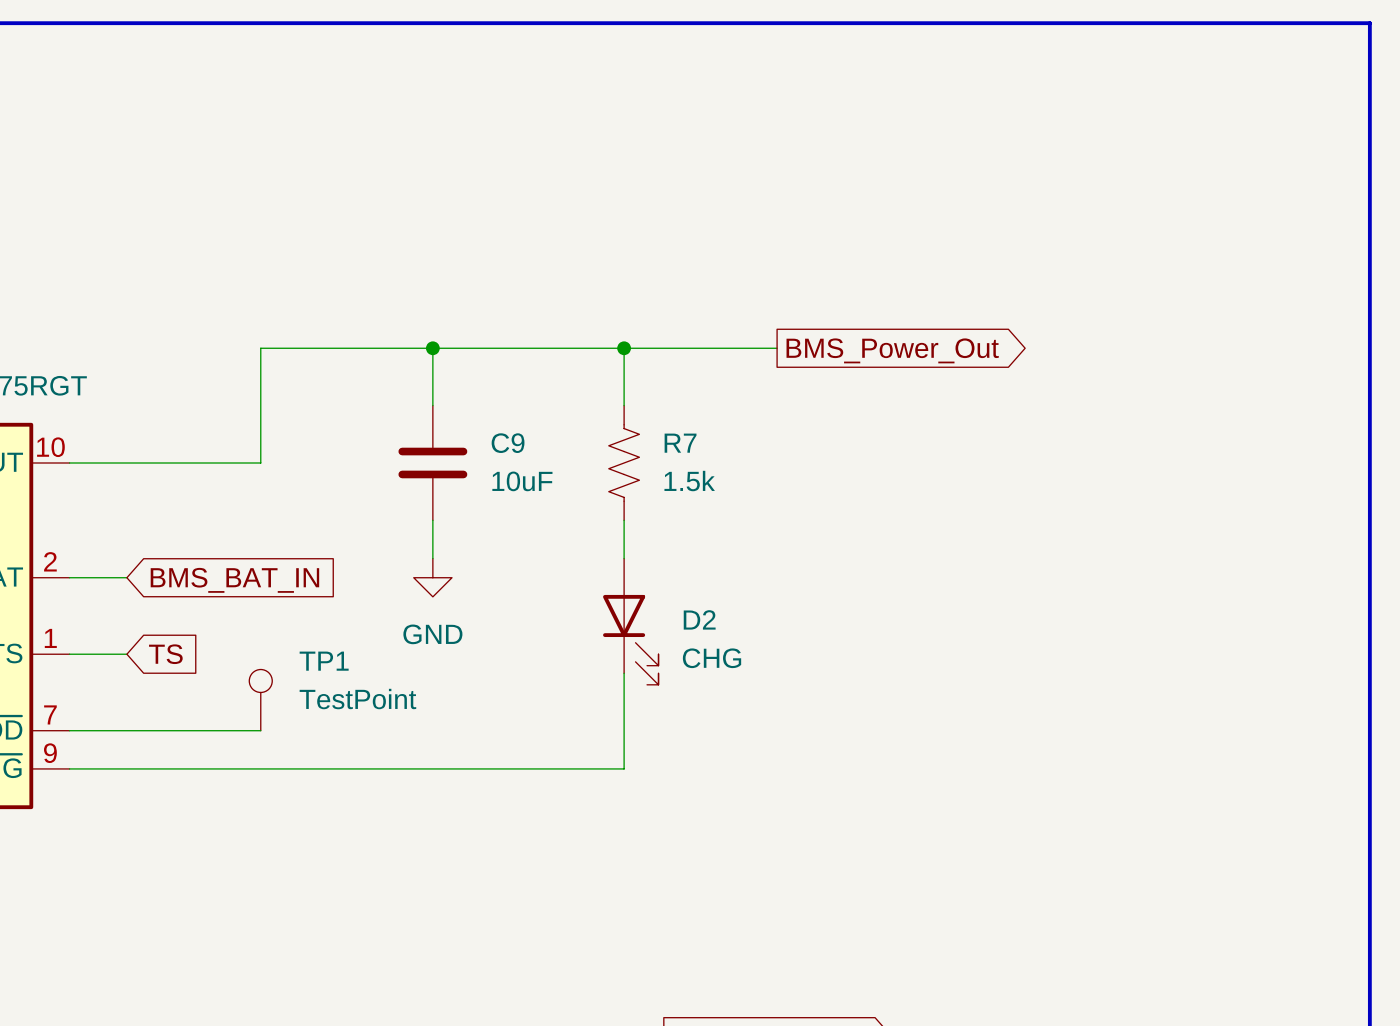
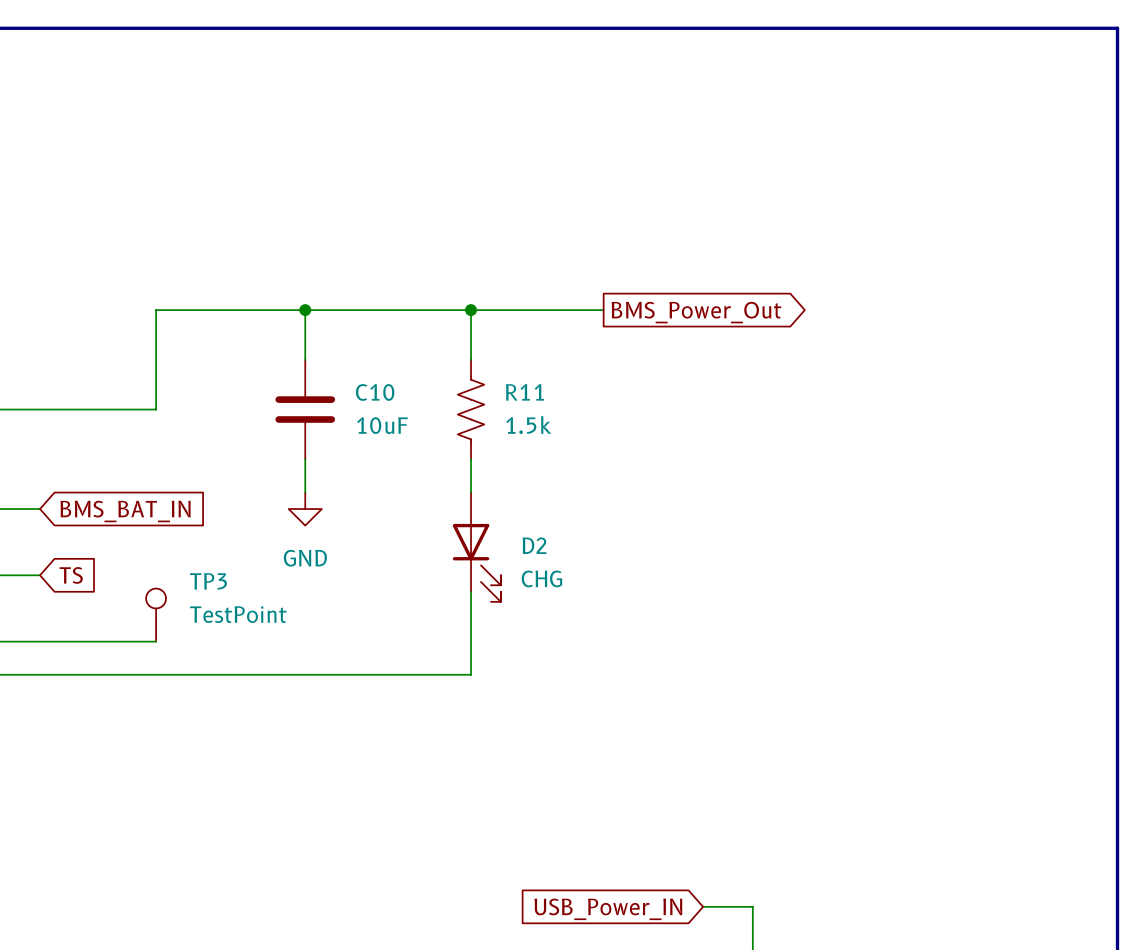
C9 name: C9 (508, 443) -> C10 (375, 392)
R7 name: R7 (680, 443) -> R11 (524, 392)
TP1 name: TP1 (324, 661) -> TP3 (208, 581)

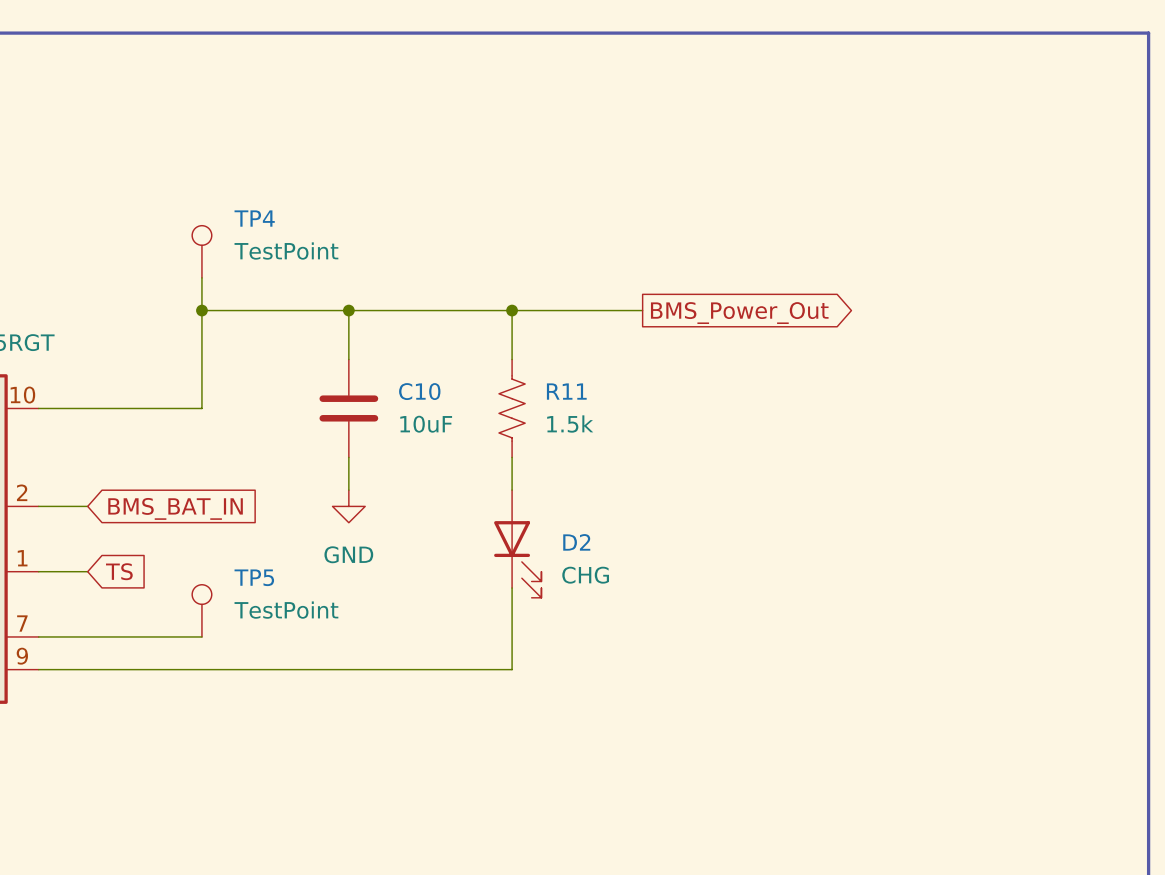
TP4: none -> TestPoint (201, 251)
wire: none -> (201, 277) (201, 310)
junction: none -> (201, 310)
TP3 name: TP3 (208, 581) -> TP5 (254, 577)

